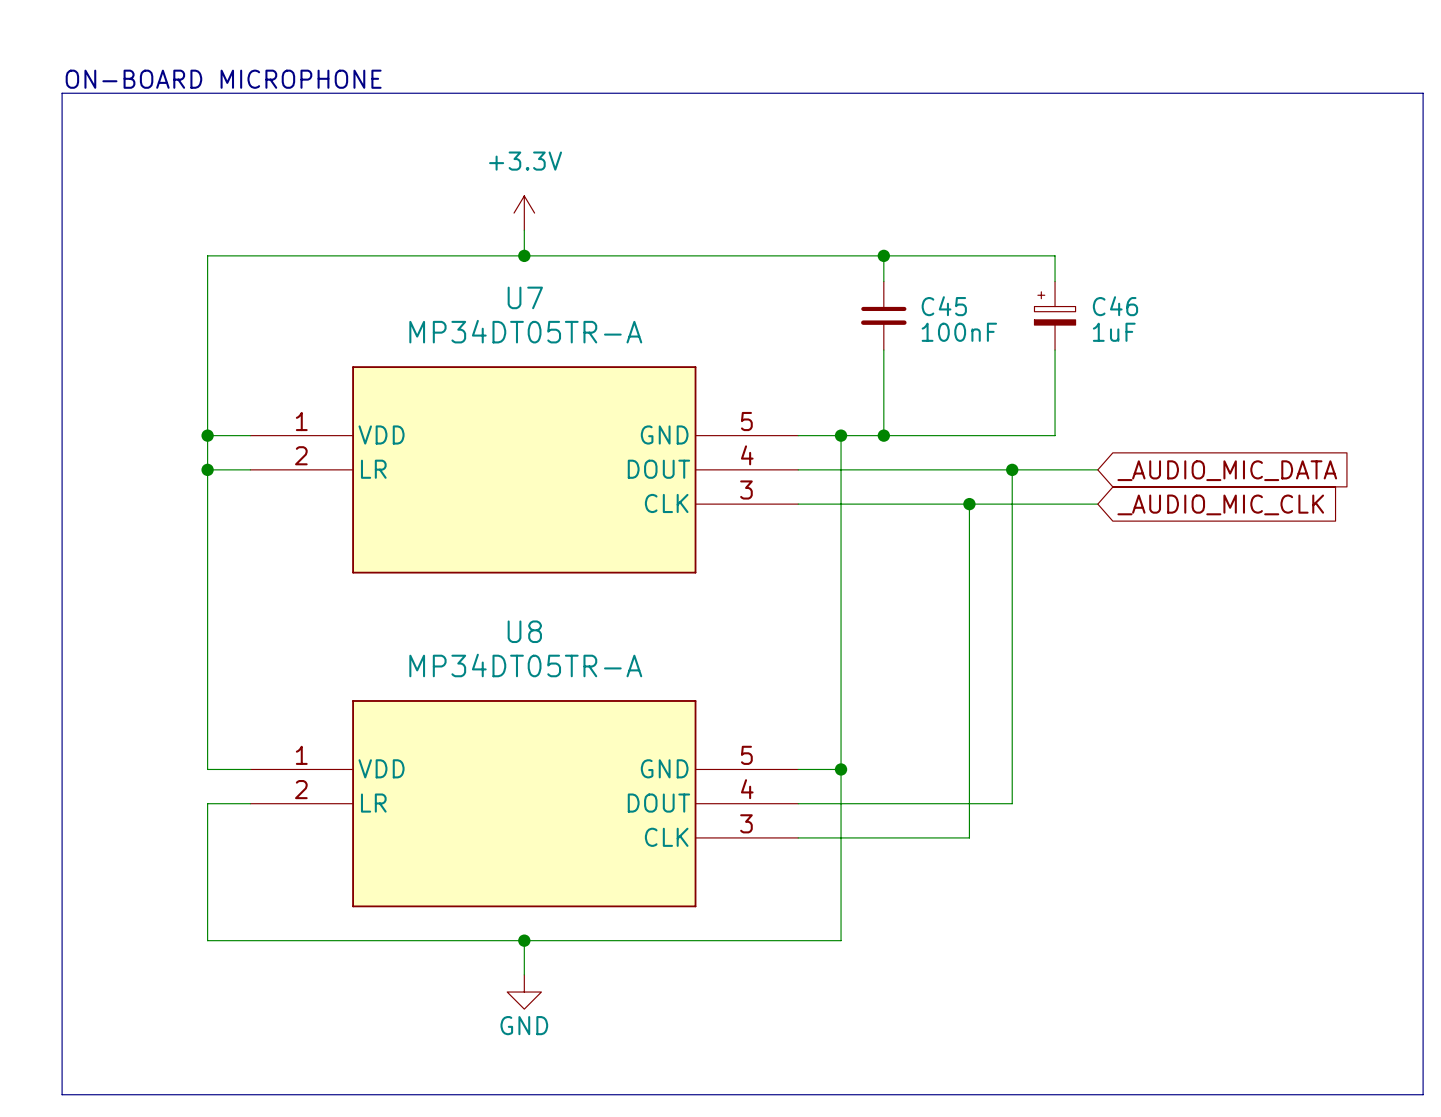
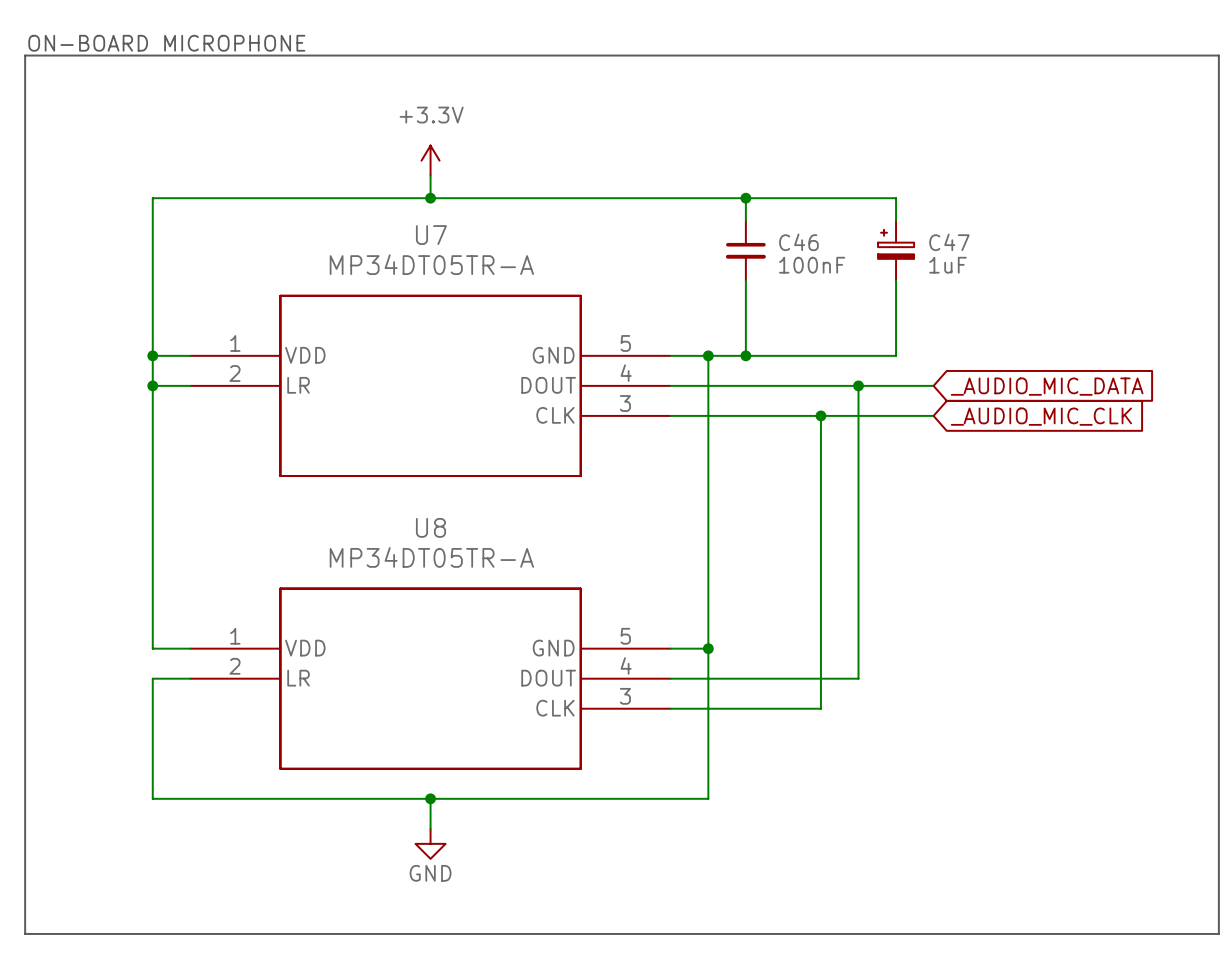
C45 name: C45 (944, 306) -> C46 (798, 242)
C46 name: C46 (1115, 306) -> C47 (949, 242)

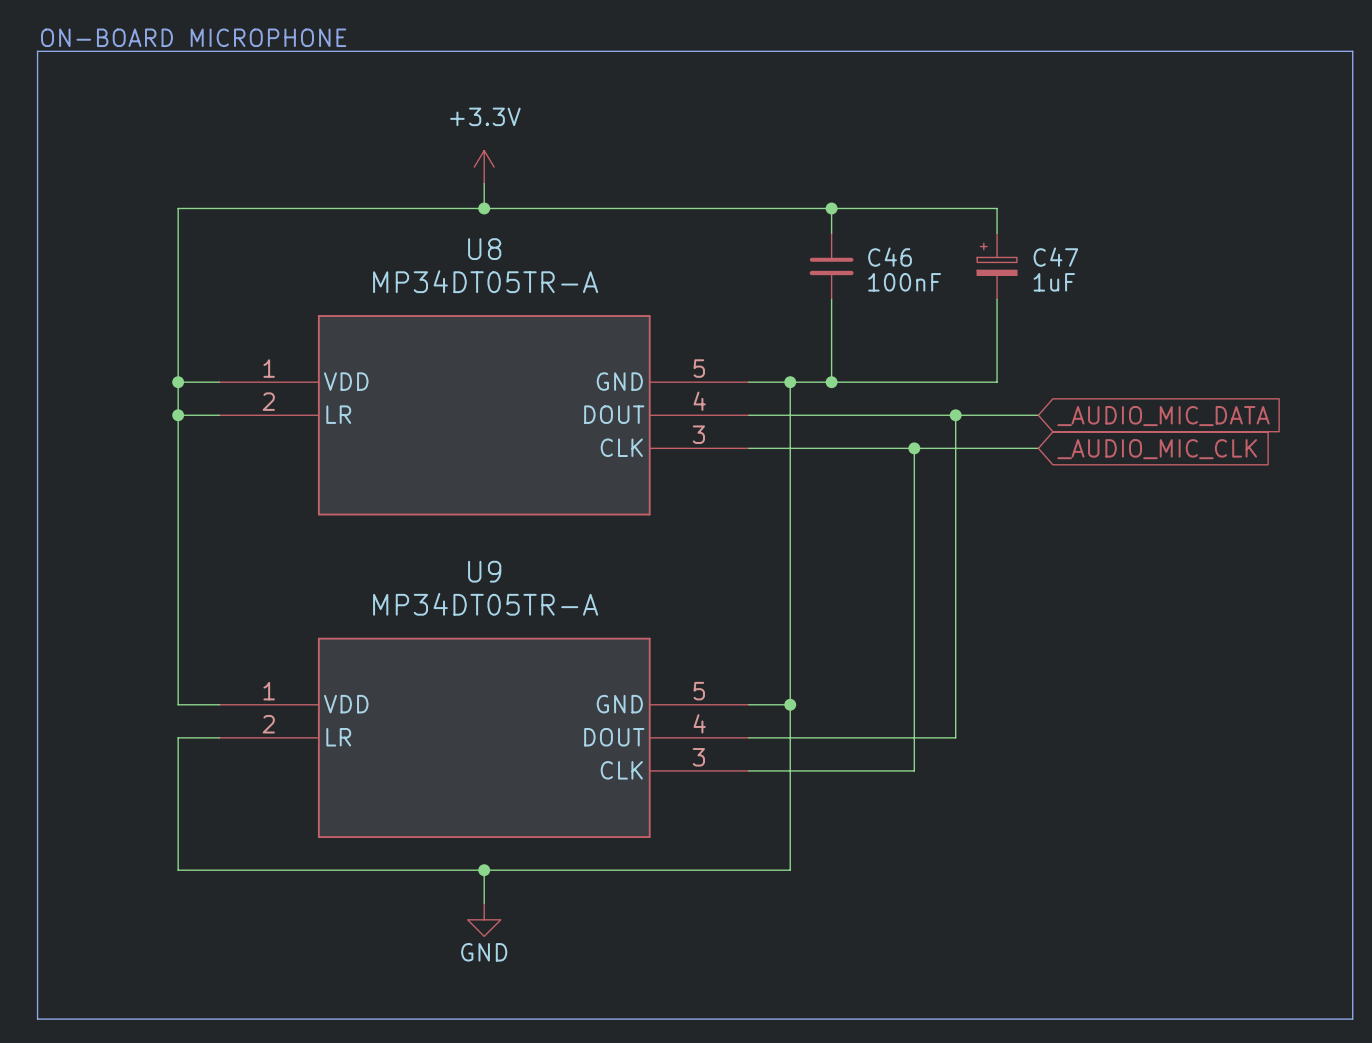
U7 name: U7 (431, 235) -> U8 (484, 249)
U8 name: U8 (430, 527) -> U9 (484, 571)

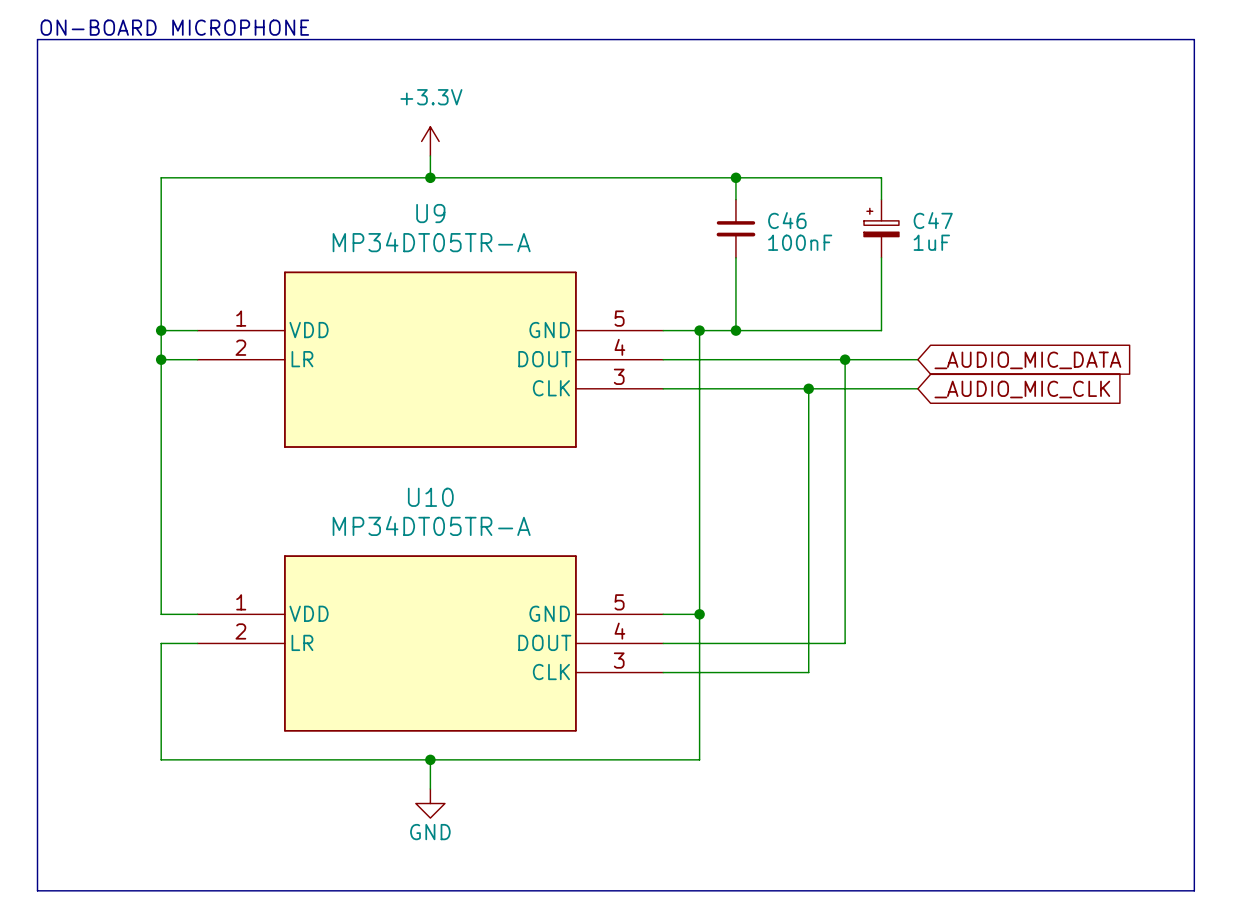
U8 name: U8 (484, 249) -> U9 (430, 213)
U9 name: U9 (484, 571) -> U10 (430, 497)

